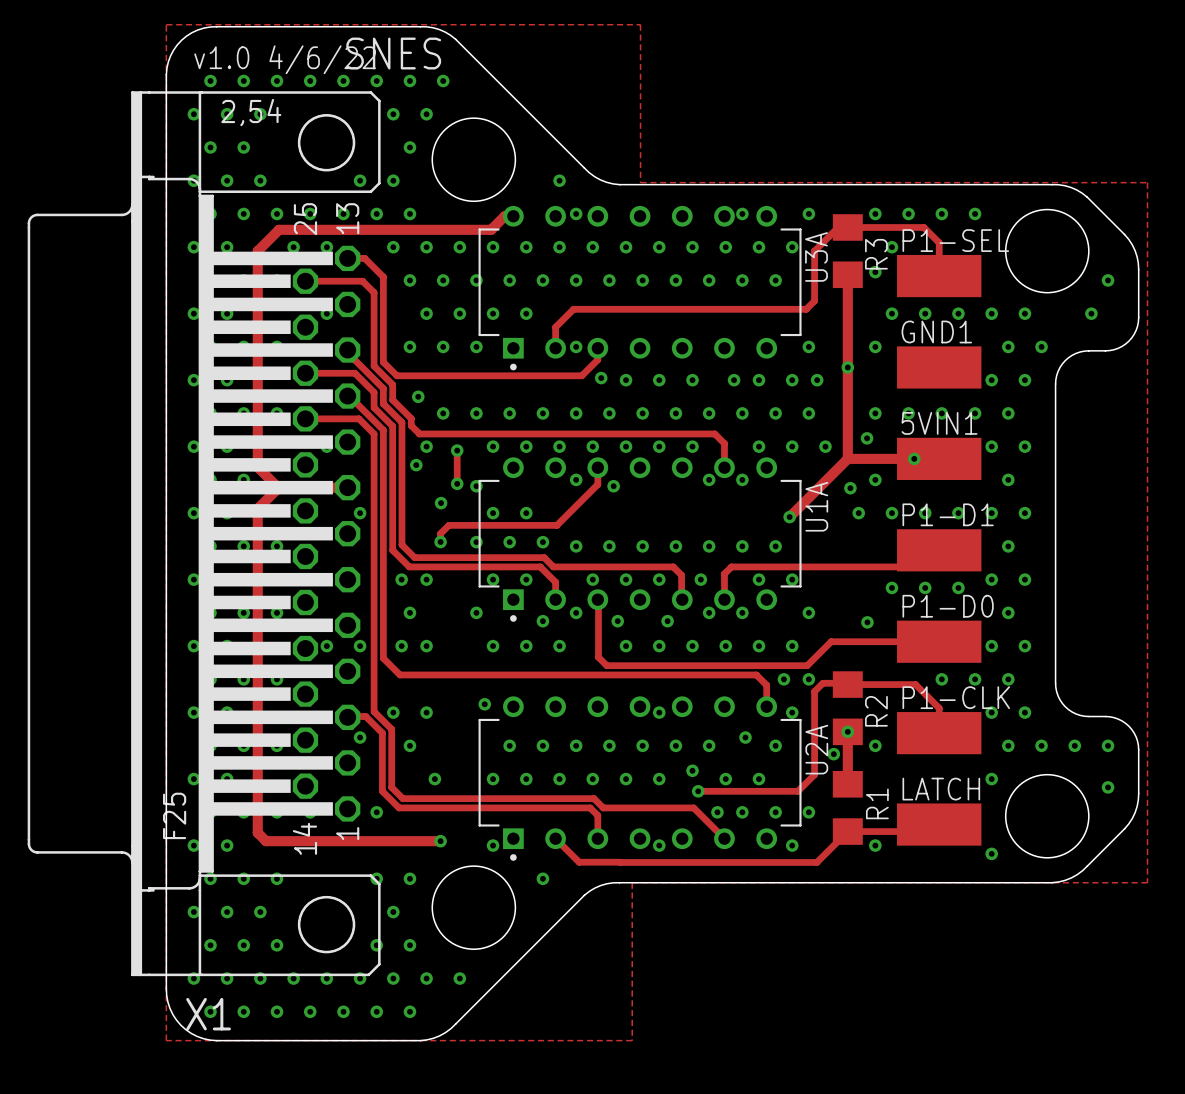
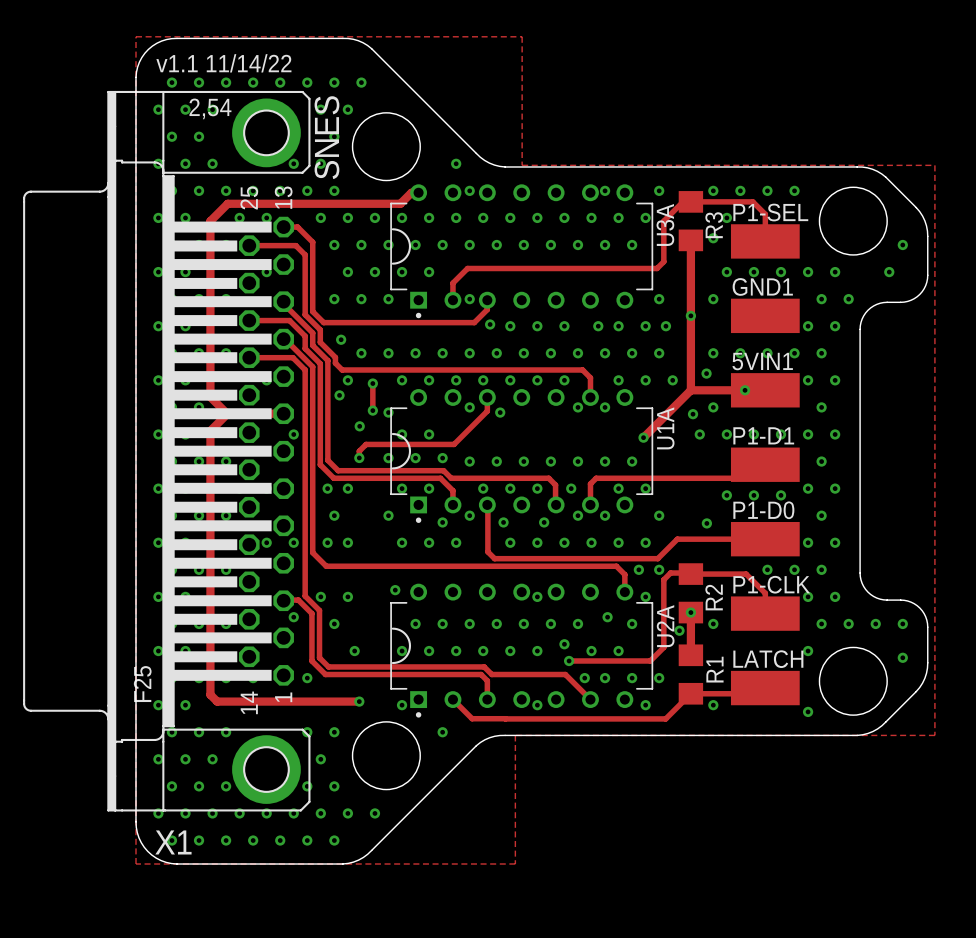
text rotation: 0° (393, 53) -> 90° counterclockwise (326, 137)
text: v1.0 4/6/22 (285, 59) -> v1.1 11/14/22 (223, 63)
X1 footprint: [27, 91, 381, 977] -> [23, 90, 311, 812]
U3A footprint: [478, 205, 802, 371] -> [390, 184, 654, 319]
U1A footprint: [478, 457, 802, 622] -> [390, 389, 654, 523]
U2A footprint: [478, 696, 802, 861] -> [390, 583, 654, 718]

